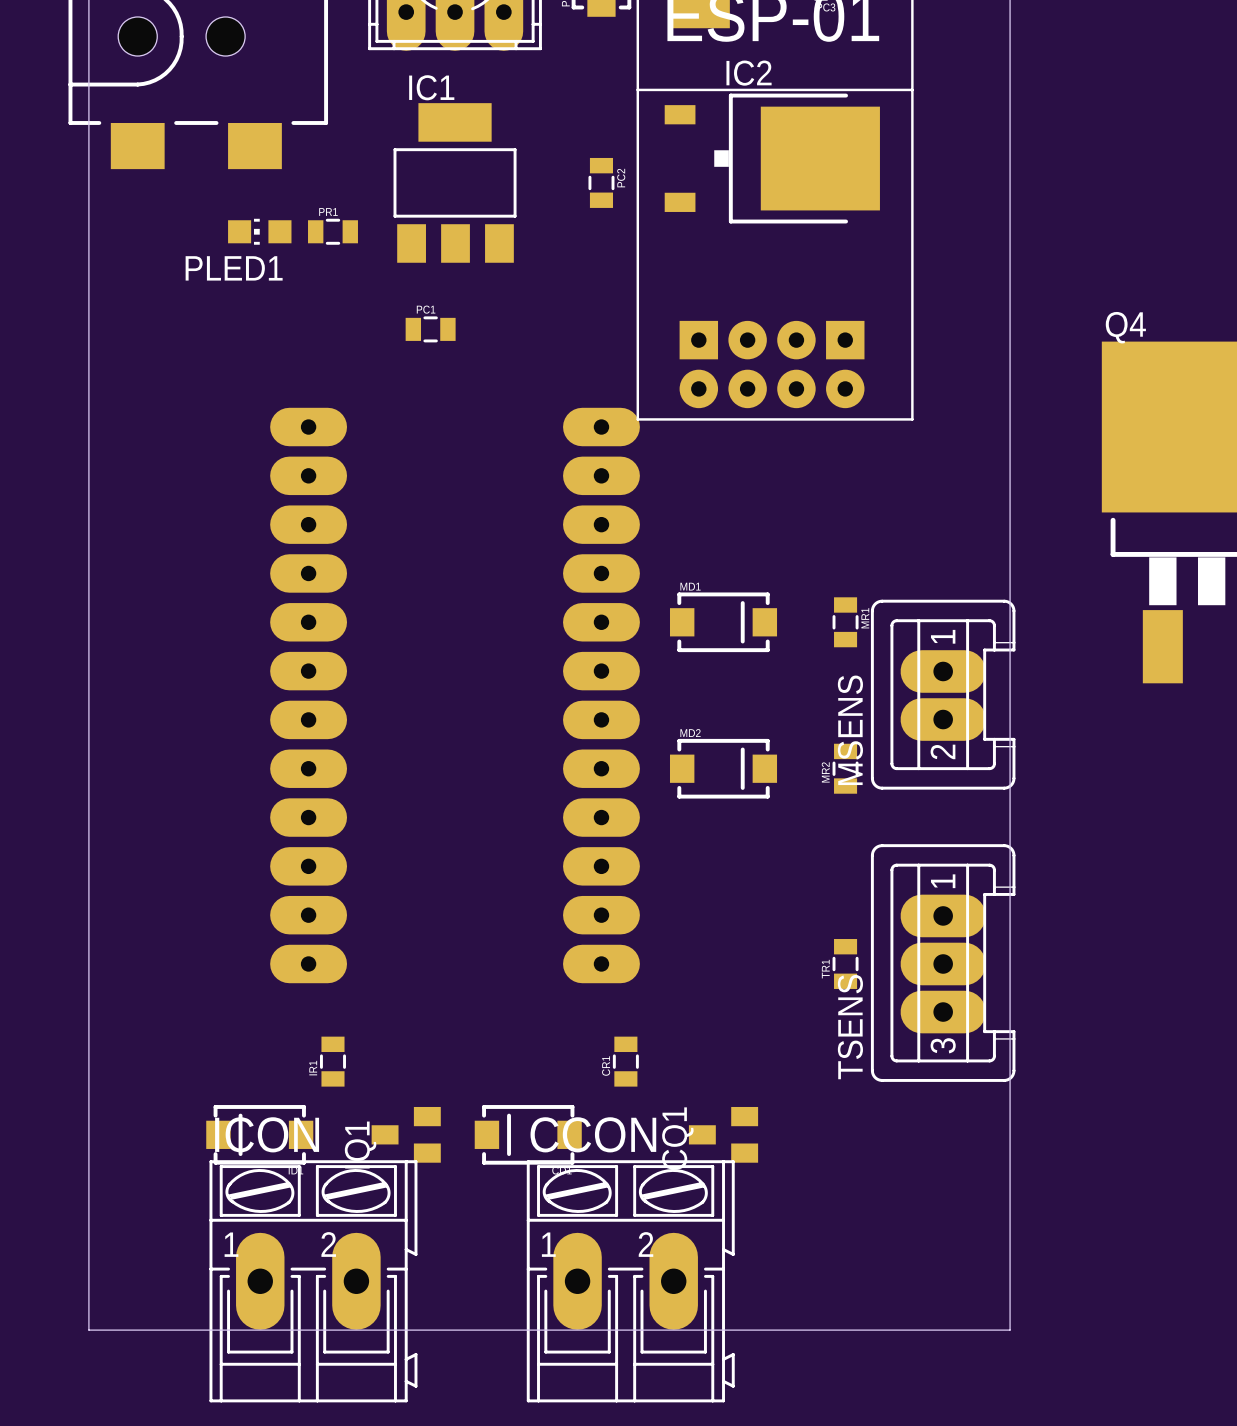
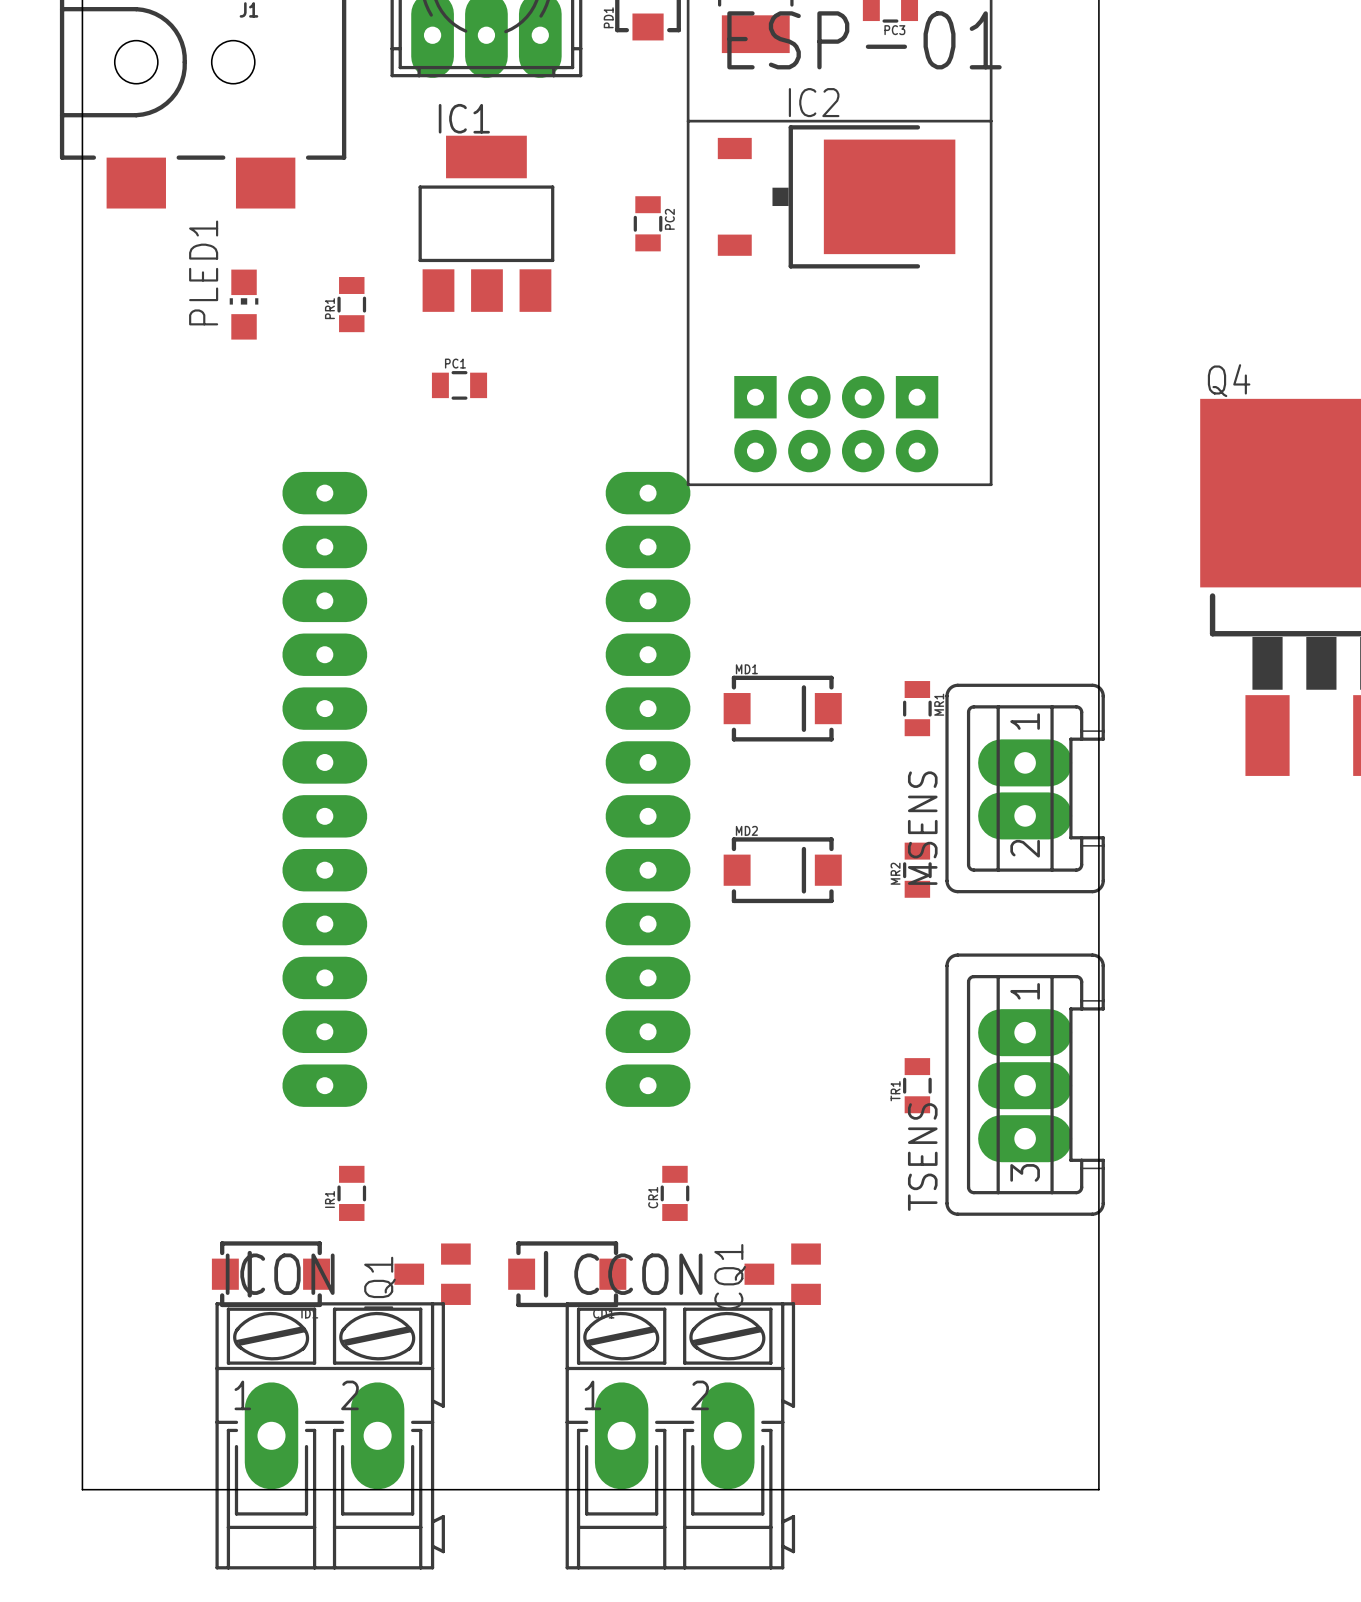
PLED1 rotation: 0° (259, 231) -> 90° clockwise (244, 304)
PR1 rotation: 0° (332, 231) -> 90° clockwise (351, 304)

